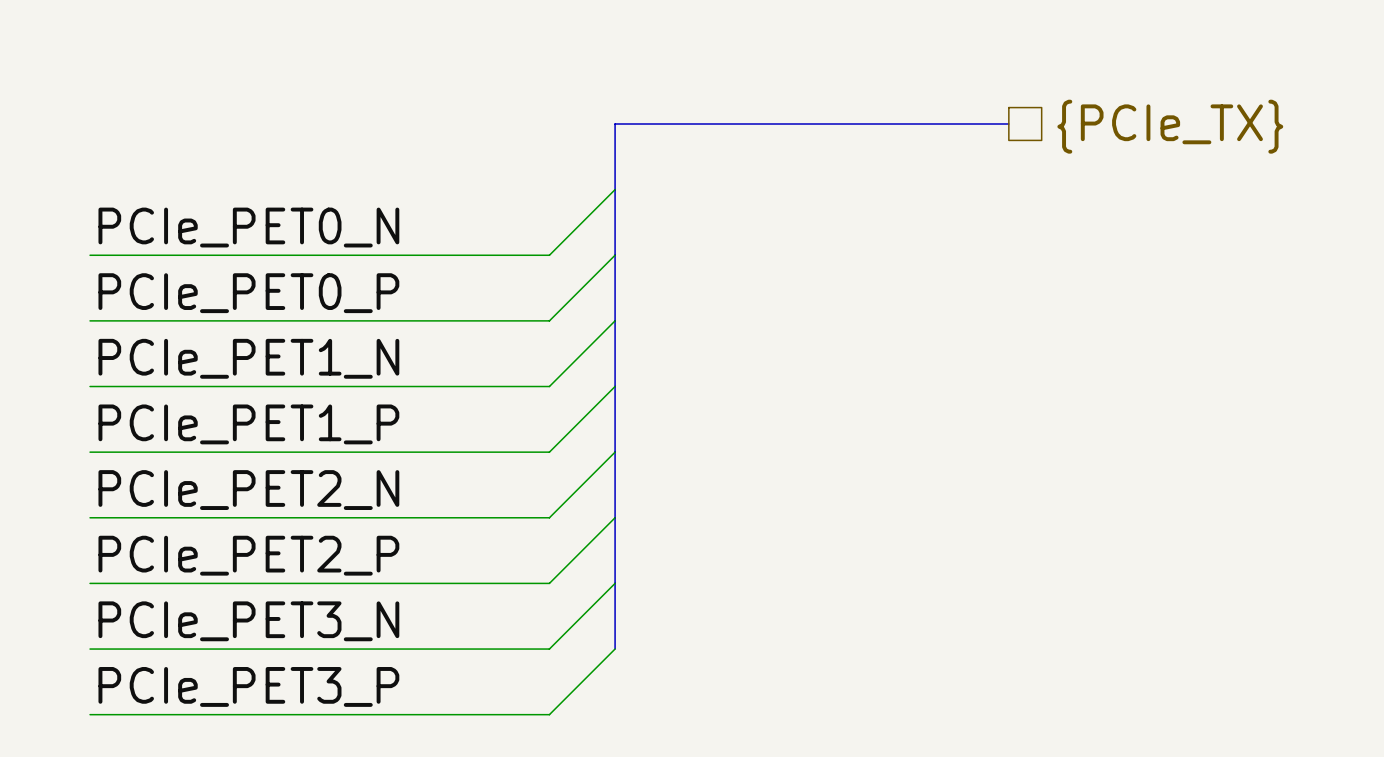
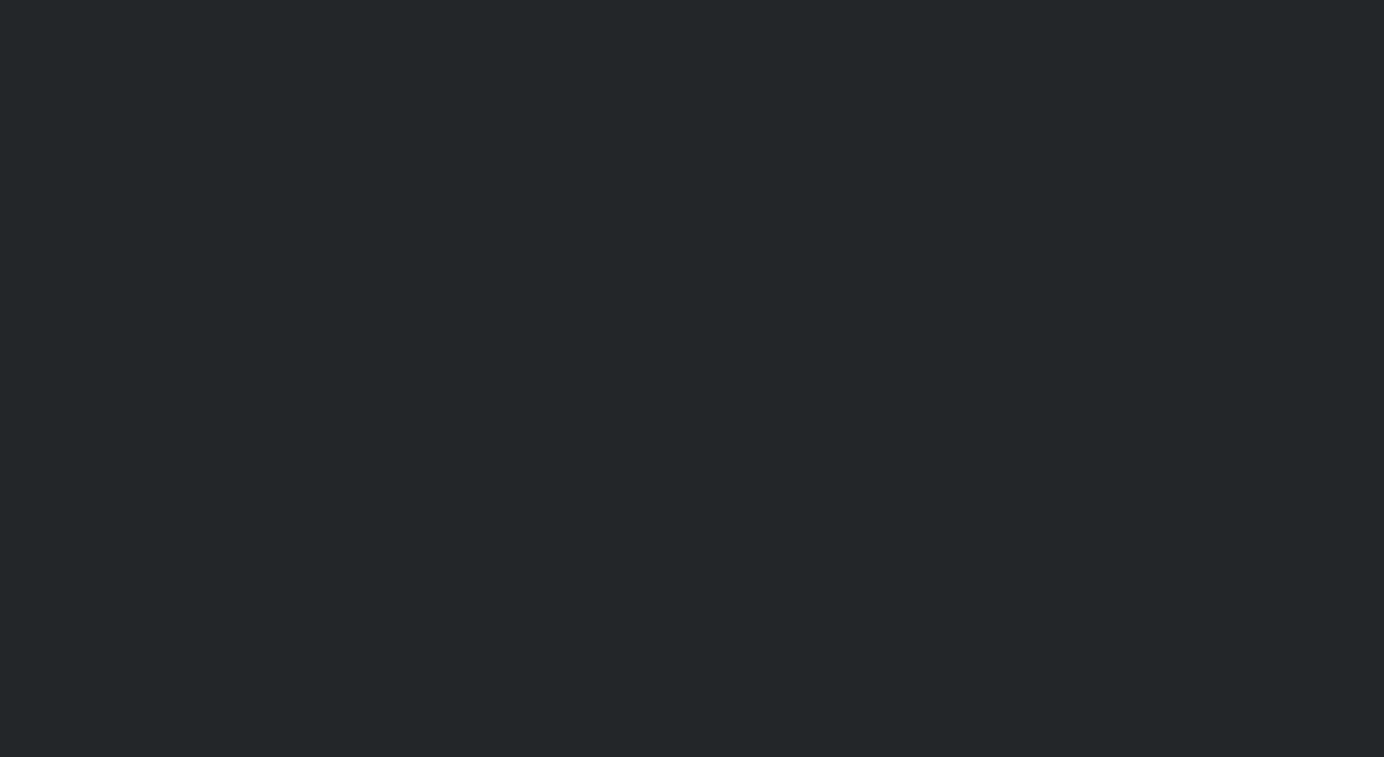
bus: (1008, 124) (615, 124) (615, 649) -> none
hierarchical label: {PCIe_TX} (1170, 126) -> none
wire: (615, 189) (549, 255) (90, 255) -> none
label: PCIe_PET0_N (248, 227) -> none
wire: (615, 255) (549, 320) (90, 320) -> none
label: PCIe_PET0_P (248, 293) -> none
wire: (615, 320) (549, 386) (90, 386) -> none
label: PCIe_PET1_N (248, 358) -> none
wire: (615, 386) (549, 452) (90, 452) -> none
label: PCIe_PET1_P (248, 424) -> none
wire: (615, 452) (549, 517) (90, 517) -> none
label: PCIe_PET2_N (248, 490) -> none
wire: (615, 517) (549, 583) (90, 583) -> none
label: PCIe_PET2_P (248, 555) -> none
wire: (615, 583) (549, 649) (90, 649) -> none
label: PCIe_PET3_N (248, 621) -> none
wire: (615, 649) (549, 714) (90, 714) -> none
label: PCIe_PET3_P (248, 686) -> none

